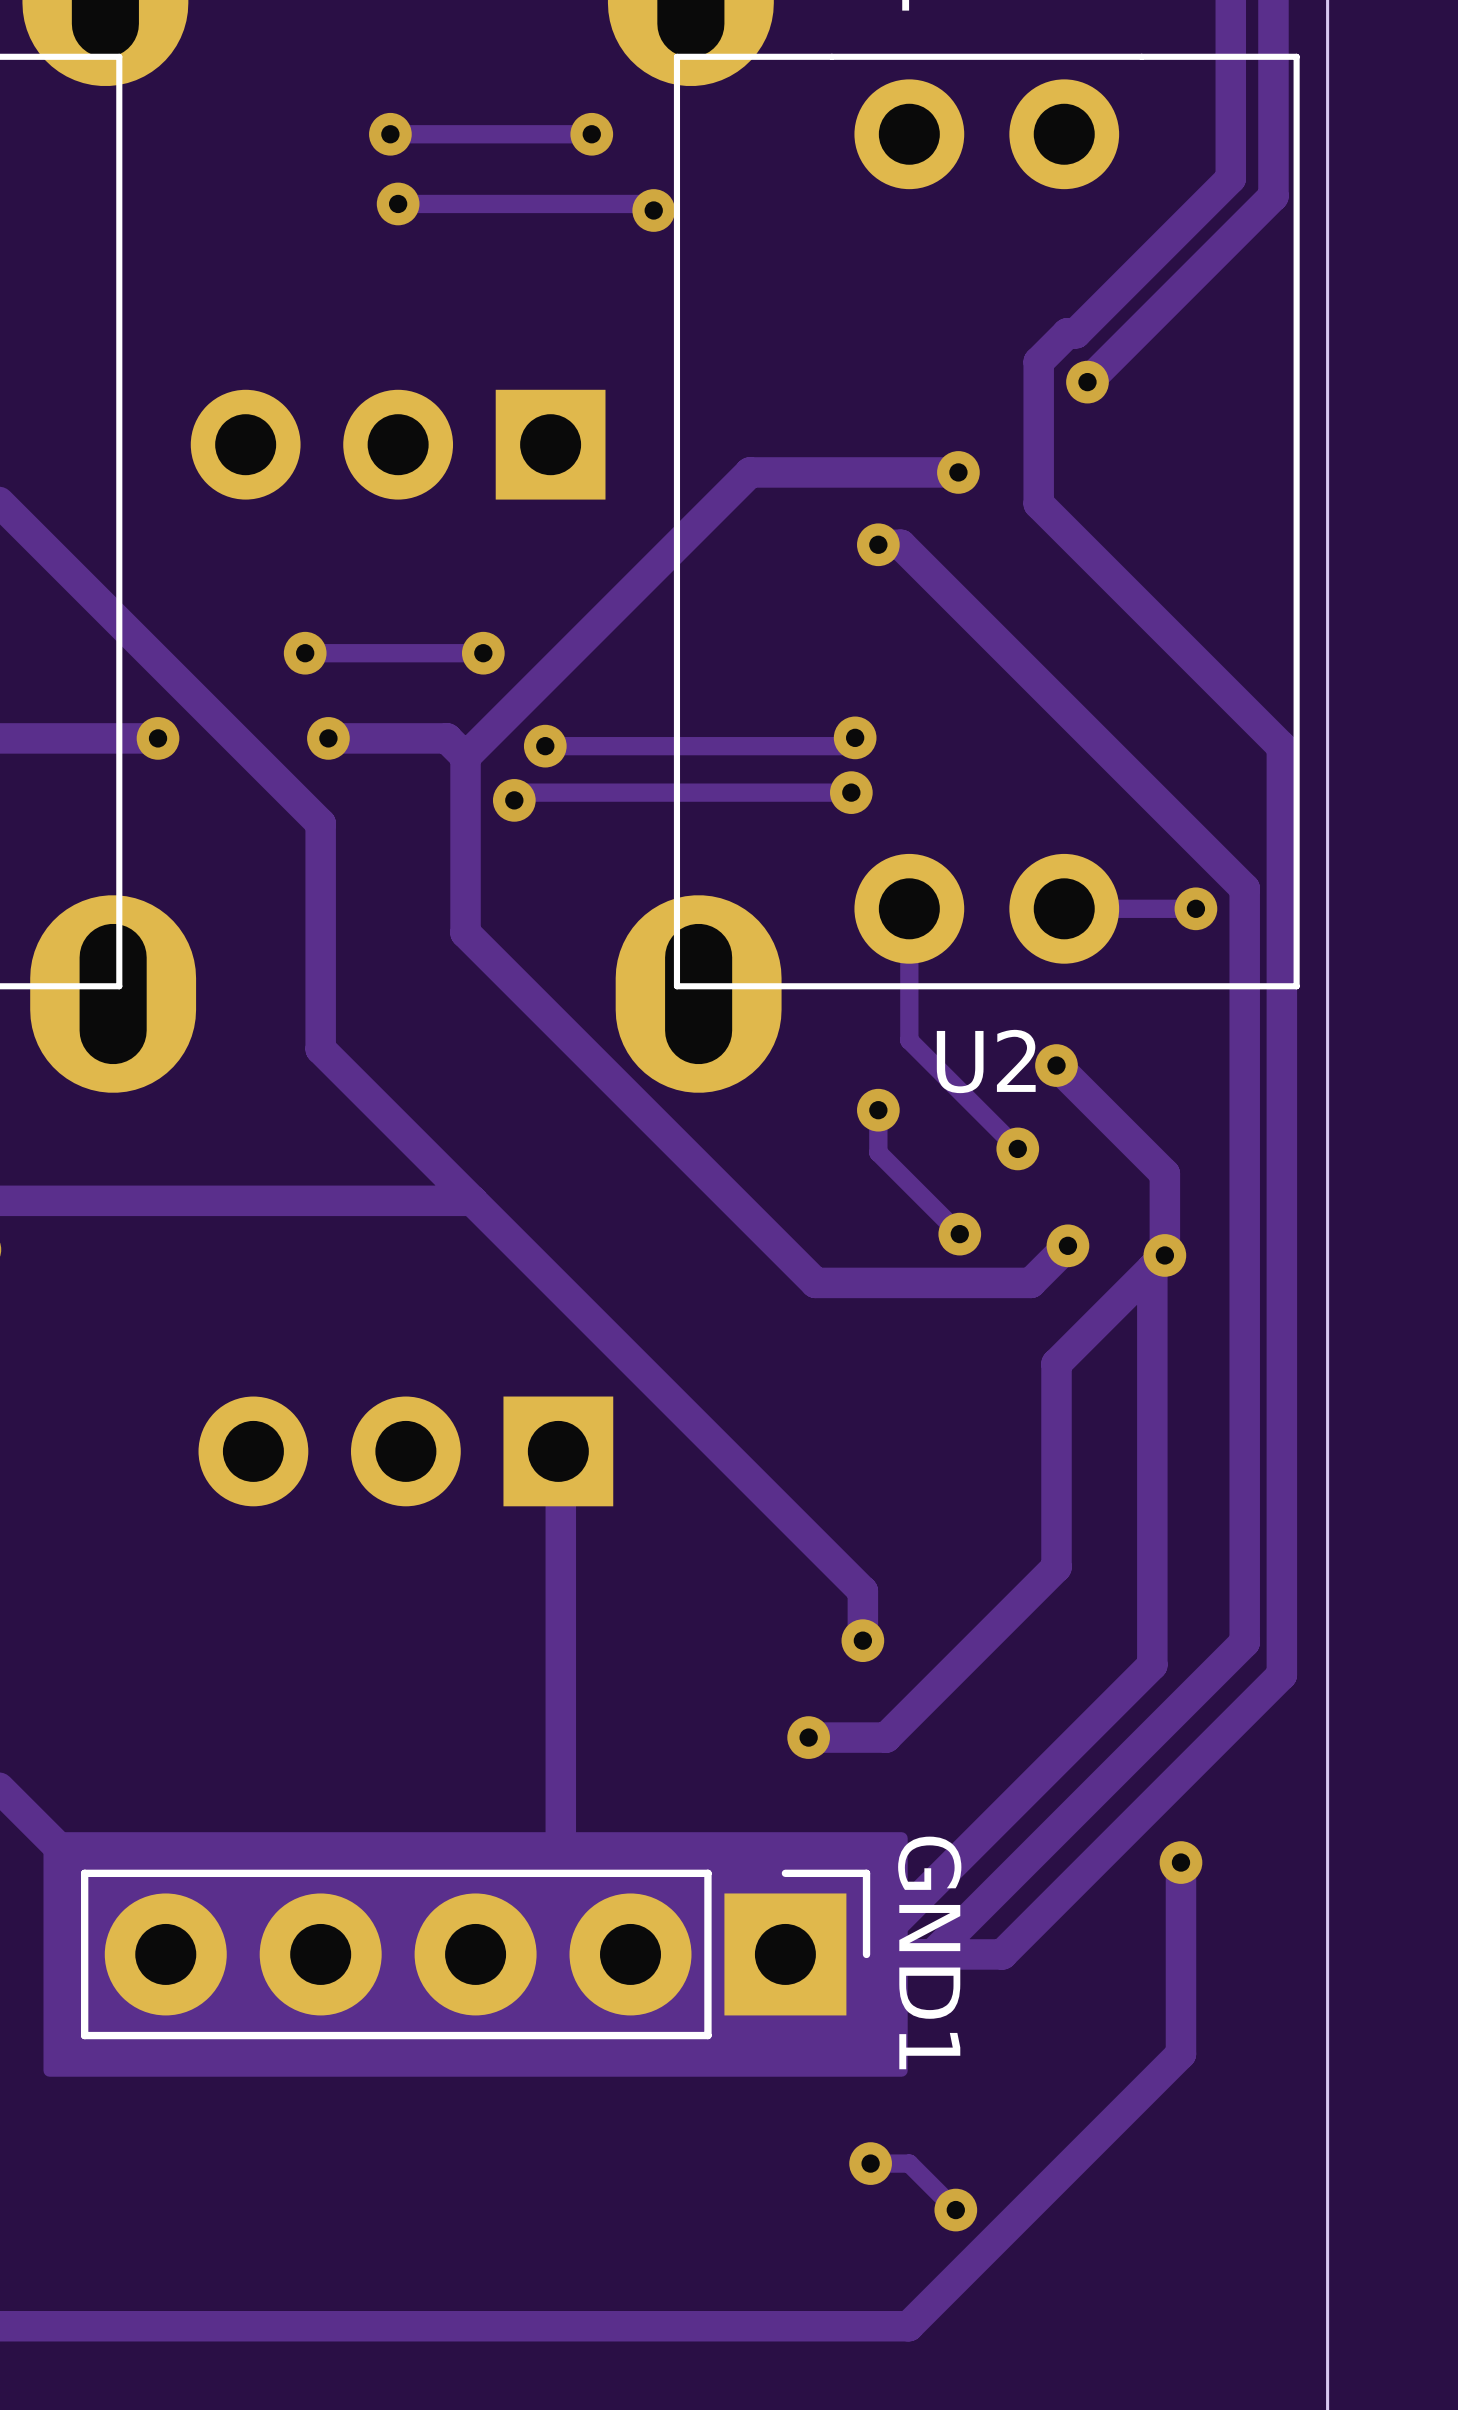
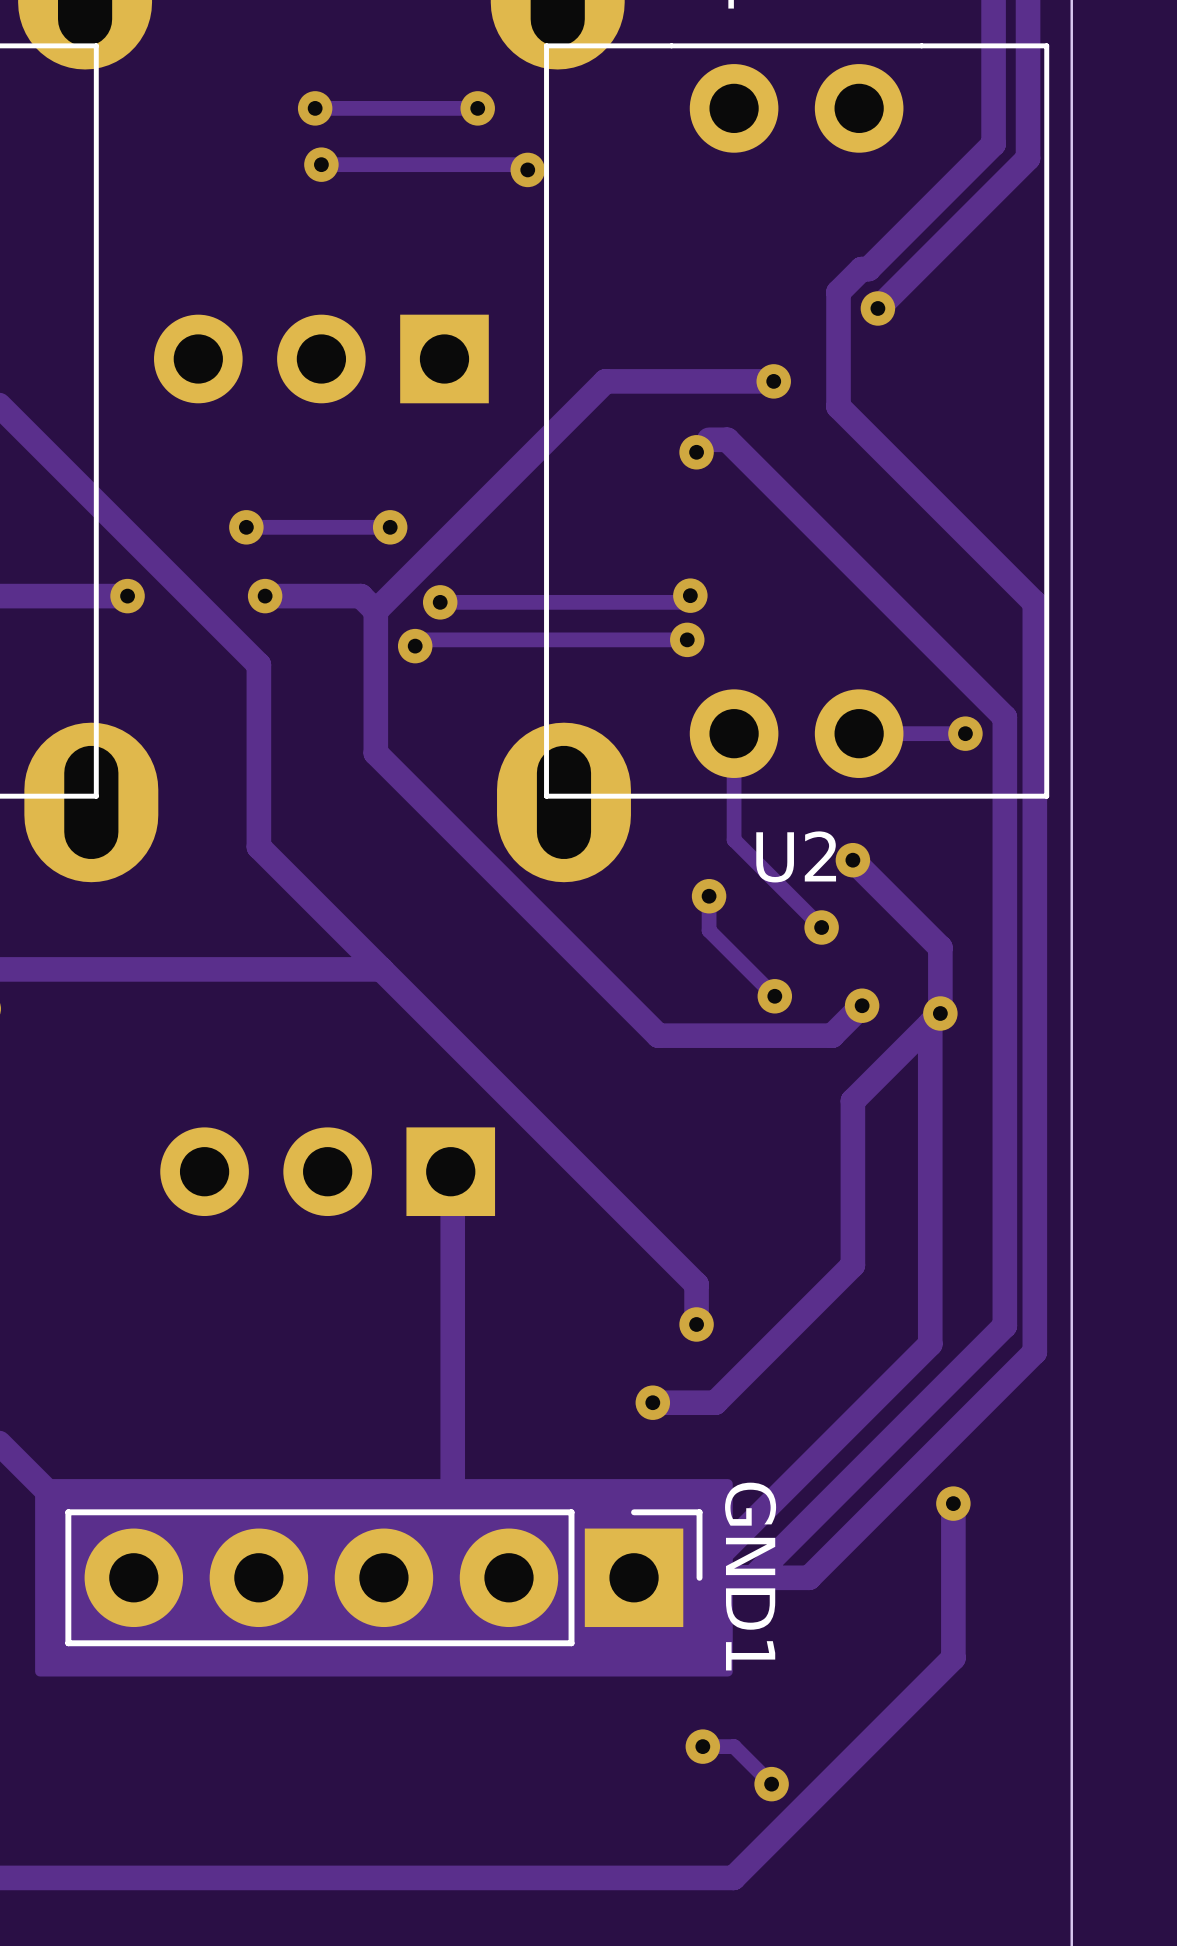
via position: (878, 544) -> (696, 452)

